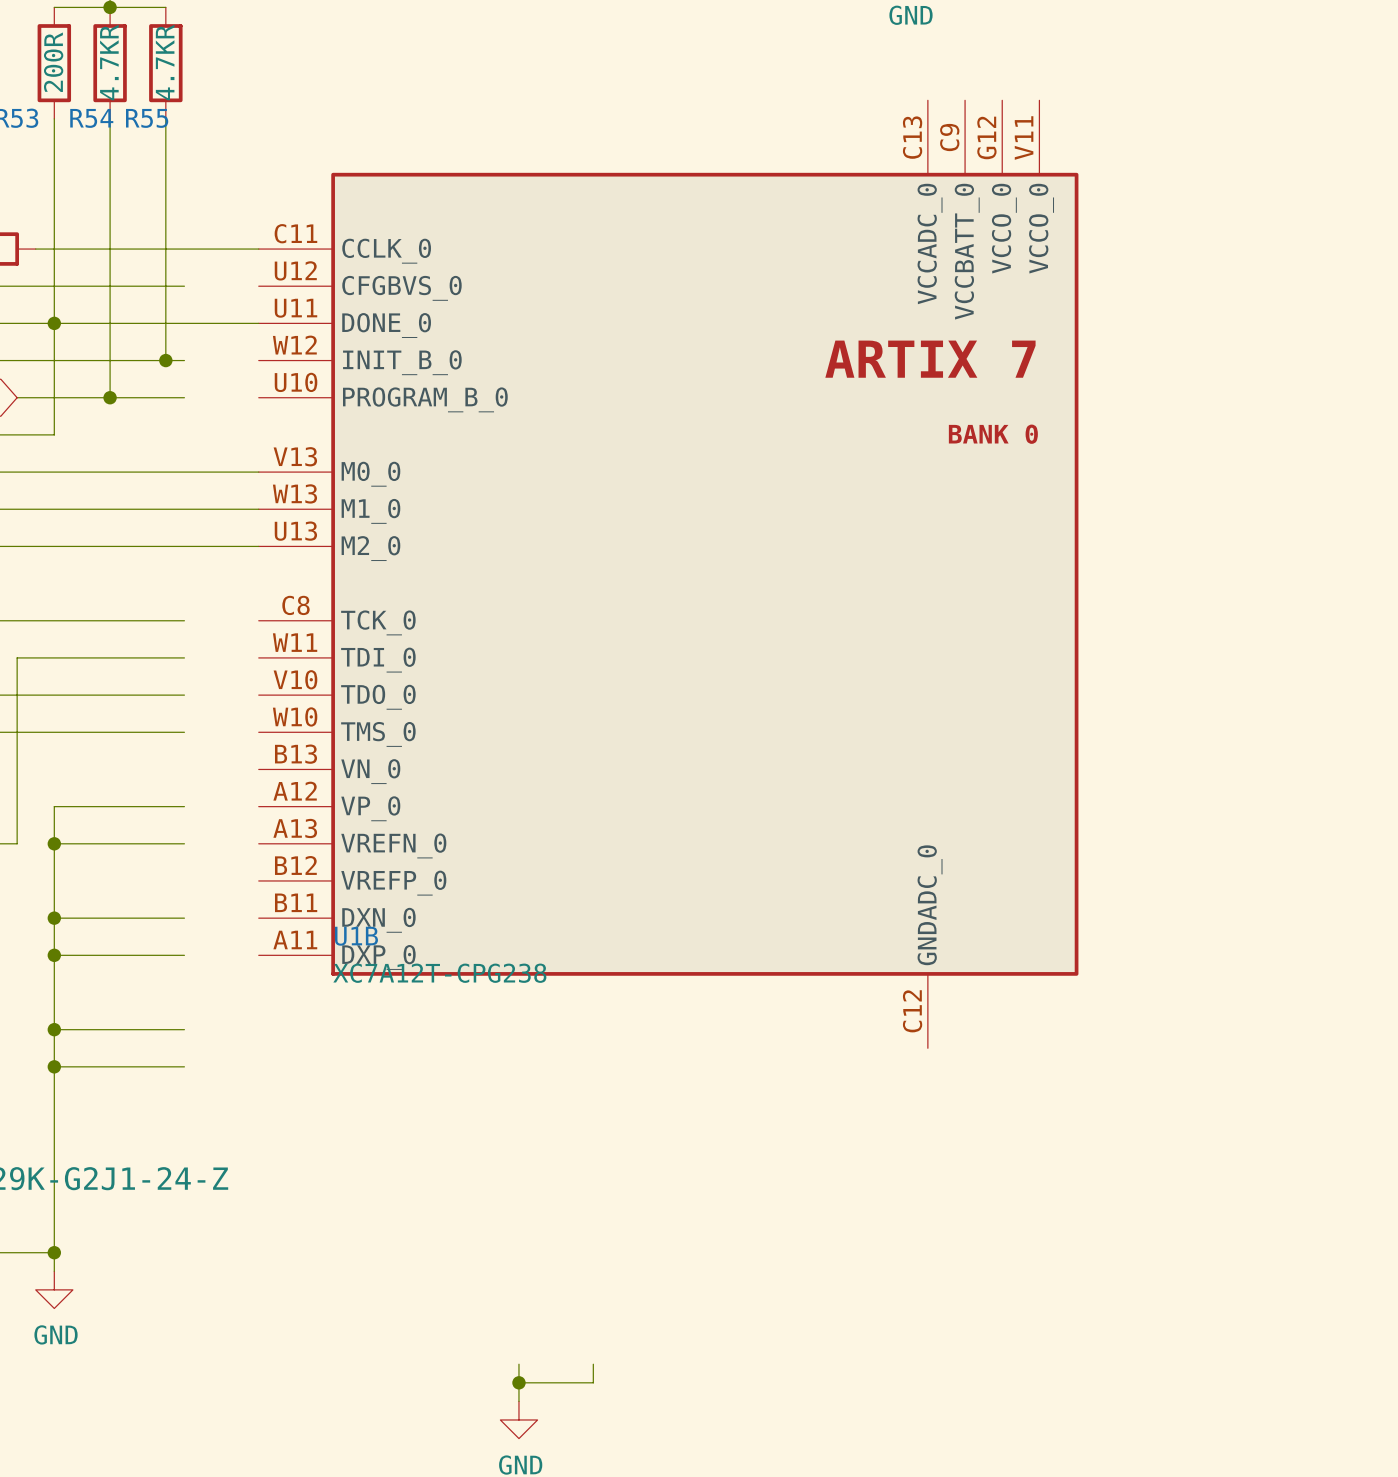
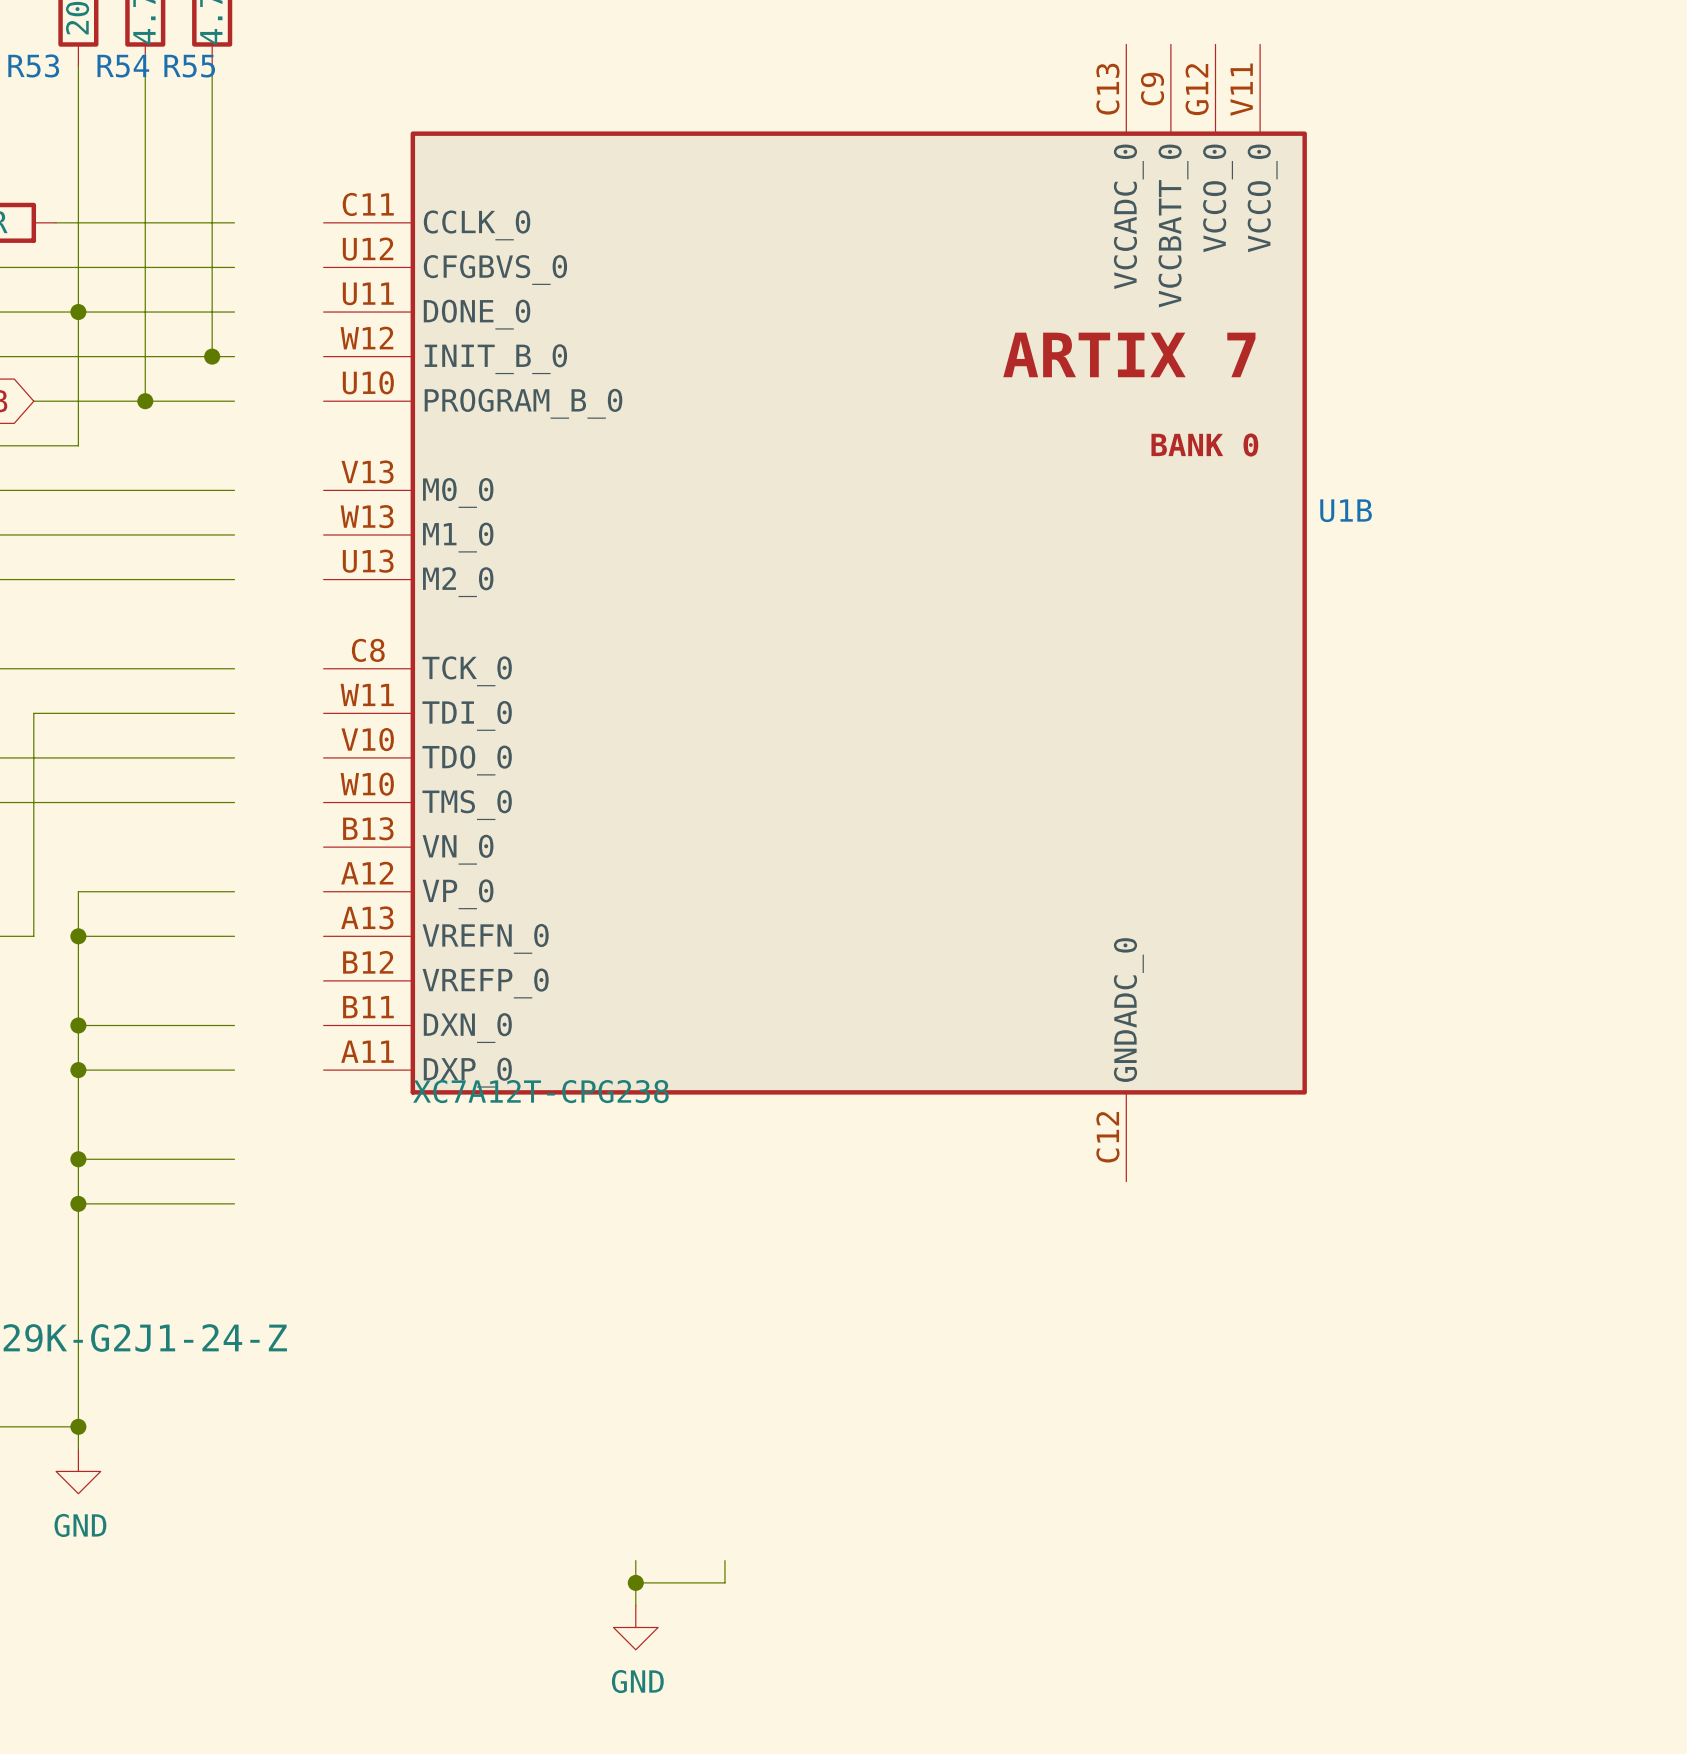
wire: (184, 249) (258, 249) -> none
wire: (184, 323) (258, 323) -> none
wire: (184, 472) (258, 472) -> none
wire: (184, 509) (258, 509) -> none
wire: (184, 546) (258, 546) -> none
U1B name position: U1B (356, 936) -> U1B (1346, 510)

